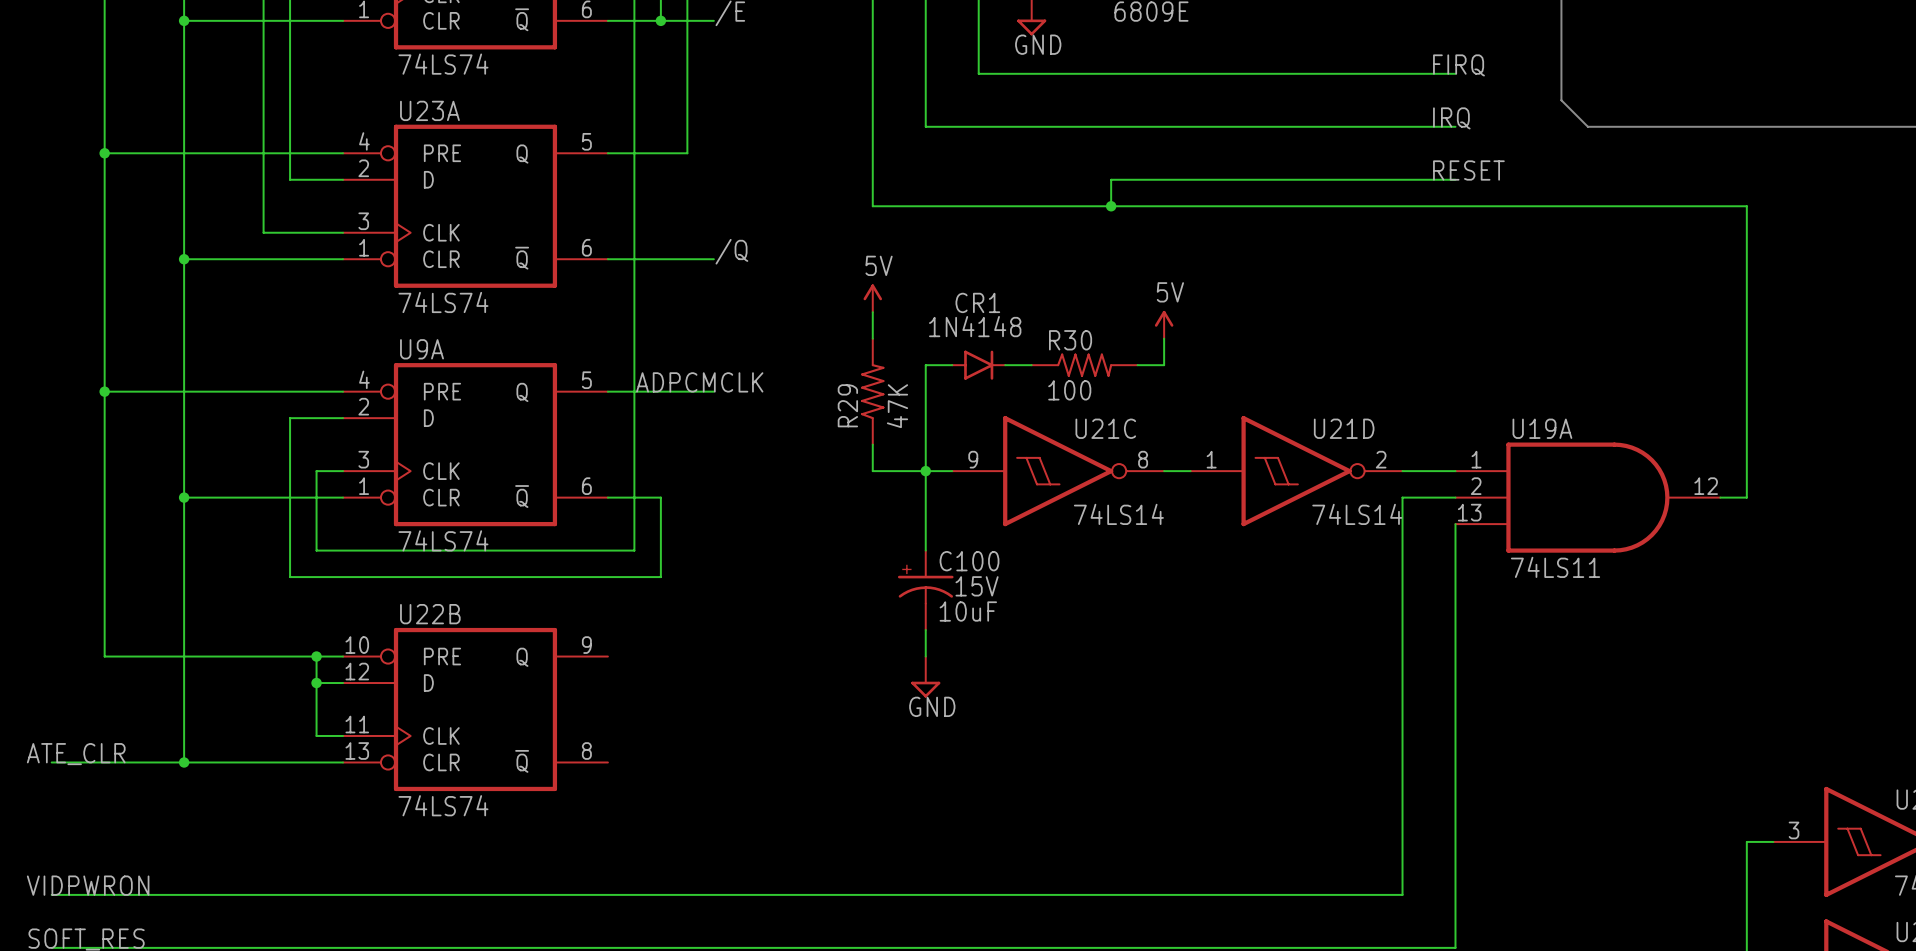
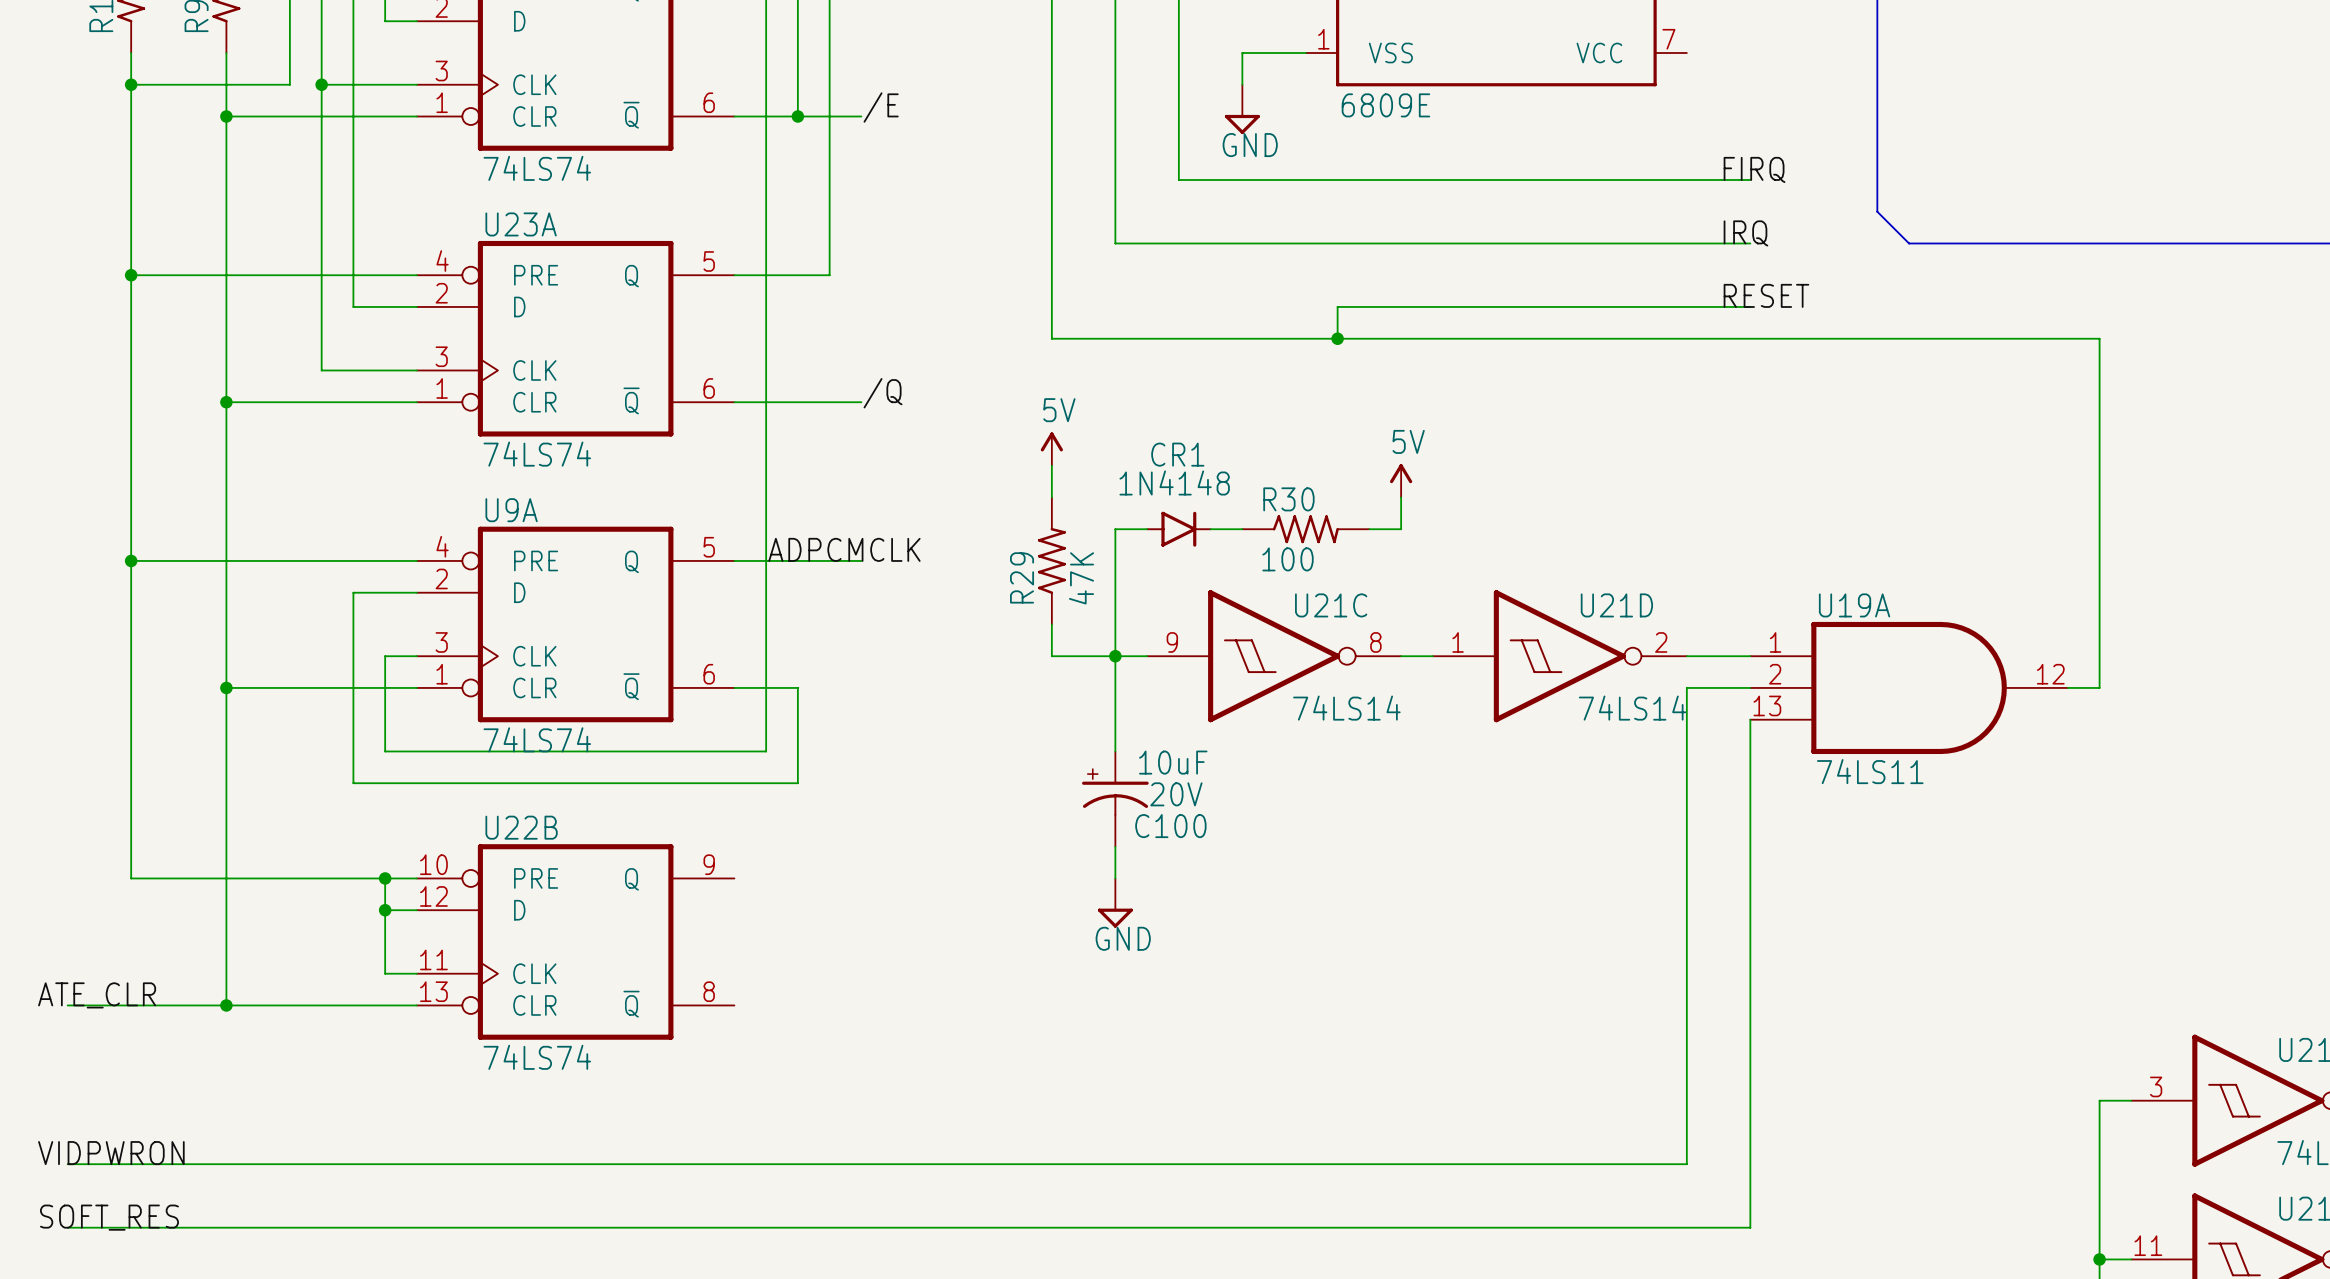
C100 name position: C100 (969, 561) -> C100 (1170, 826)
C100 text: none -> 20V (1176, 794)
C100 text: 15V (977, 586) -> none
C100 value position: 10uF (968, 611) -> 10uF (1173, 762)

